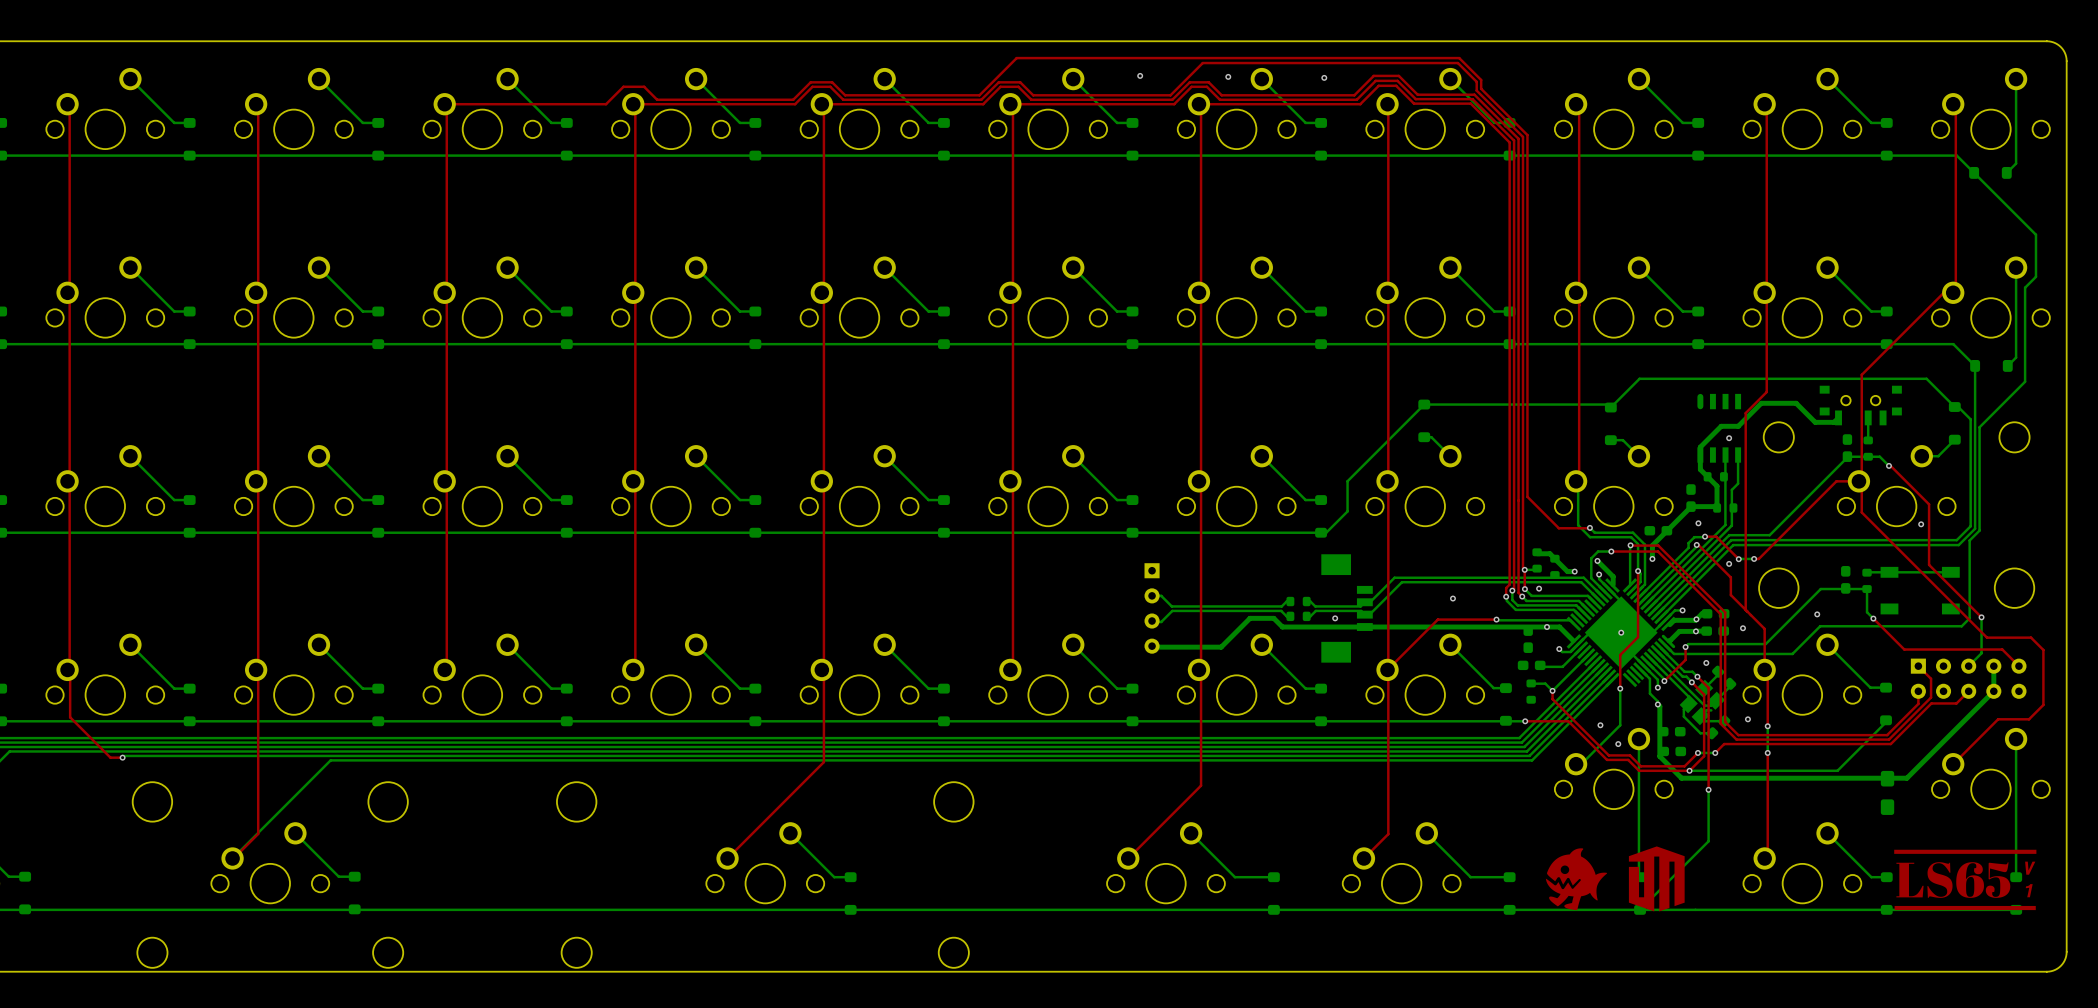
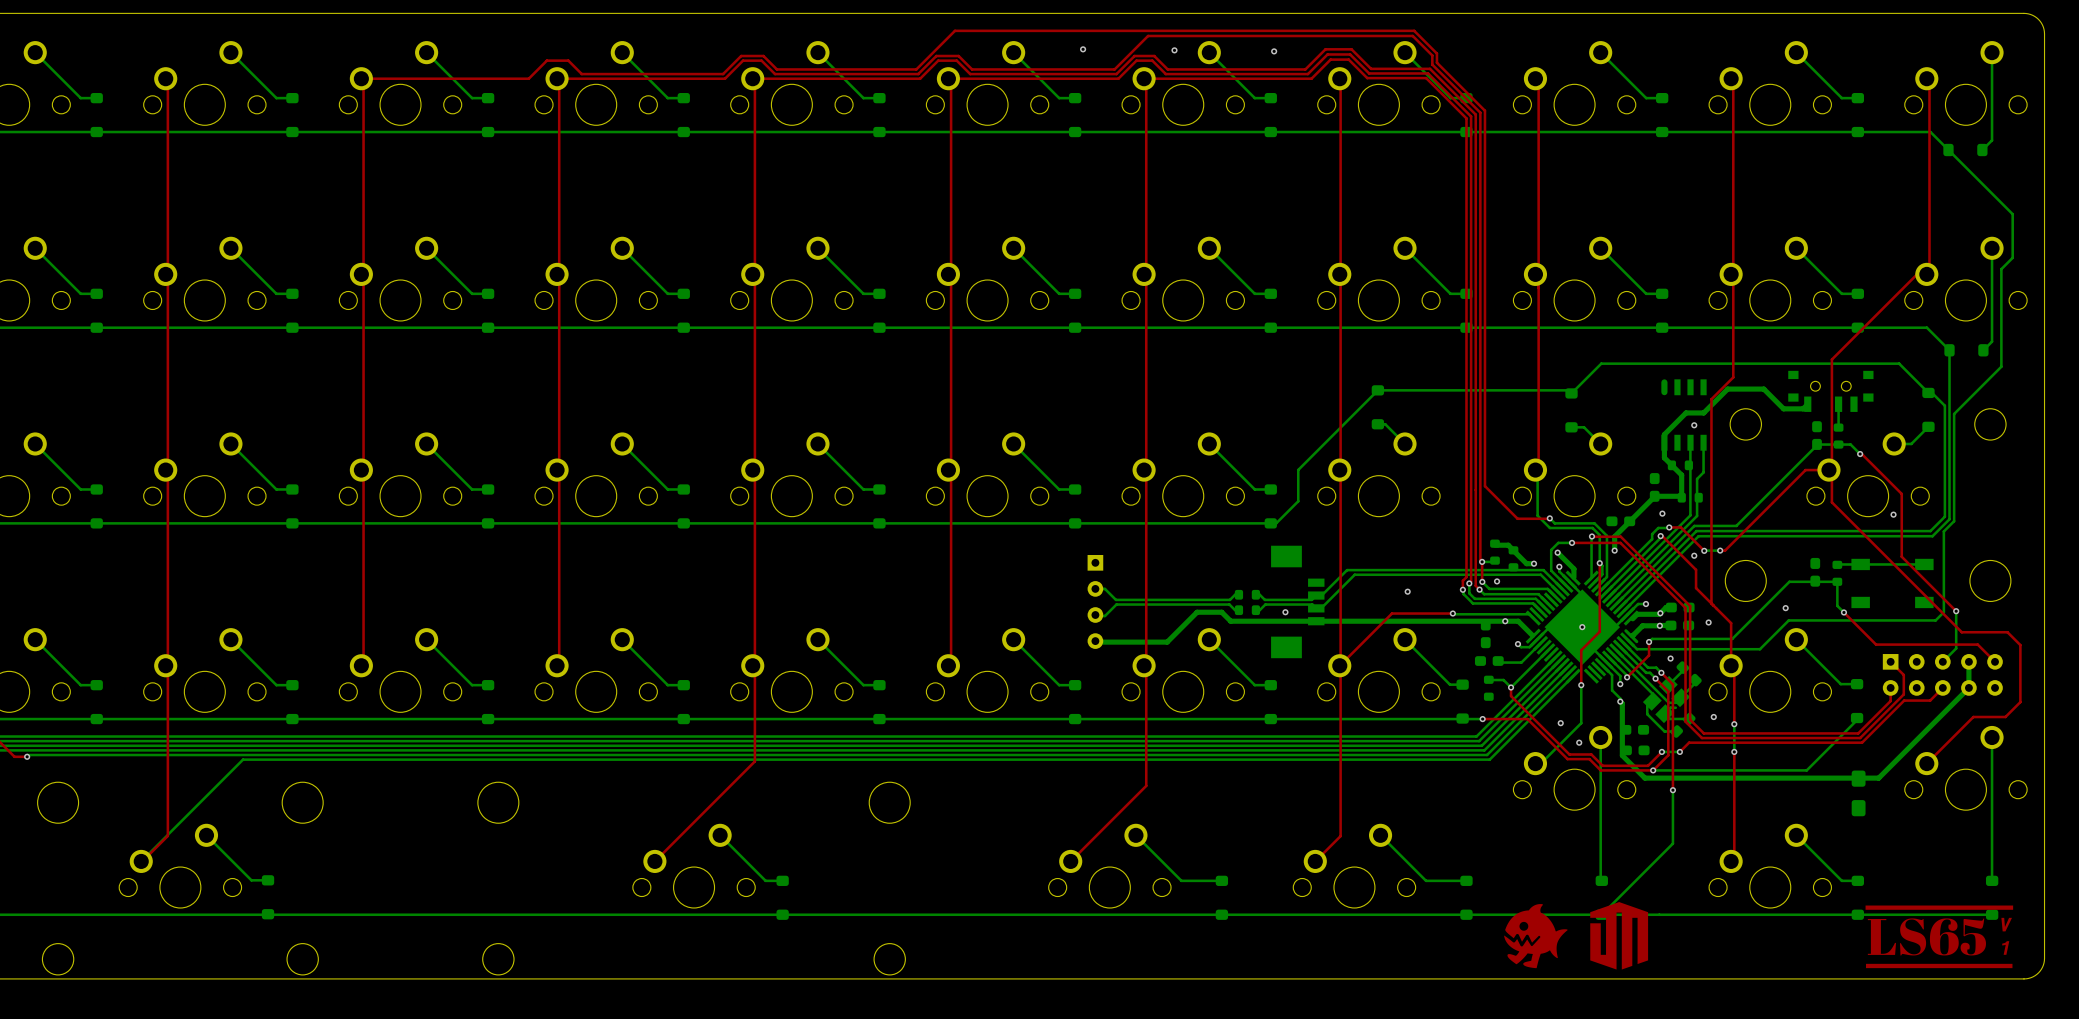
drawing position: (1656, 878) -> (1619, 935)
drawing position: (1576, 879) -> (1535, 936)
drawing position: (1965, 879) -> (1939, 936)

